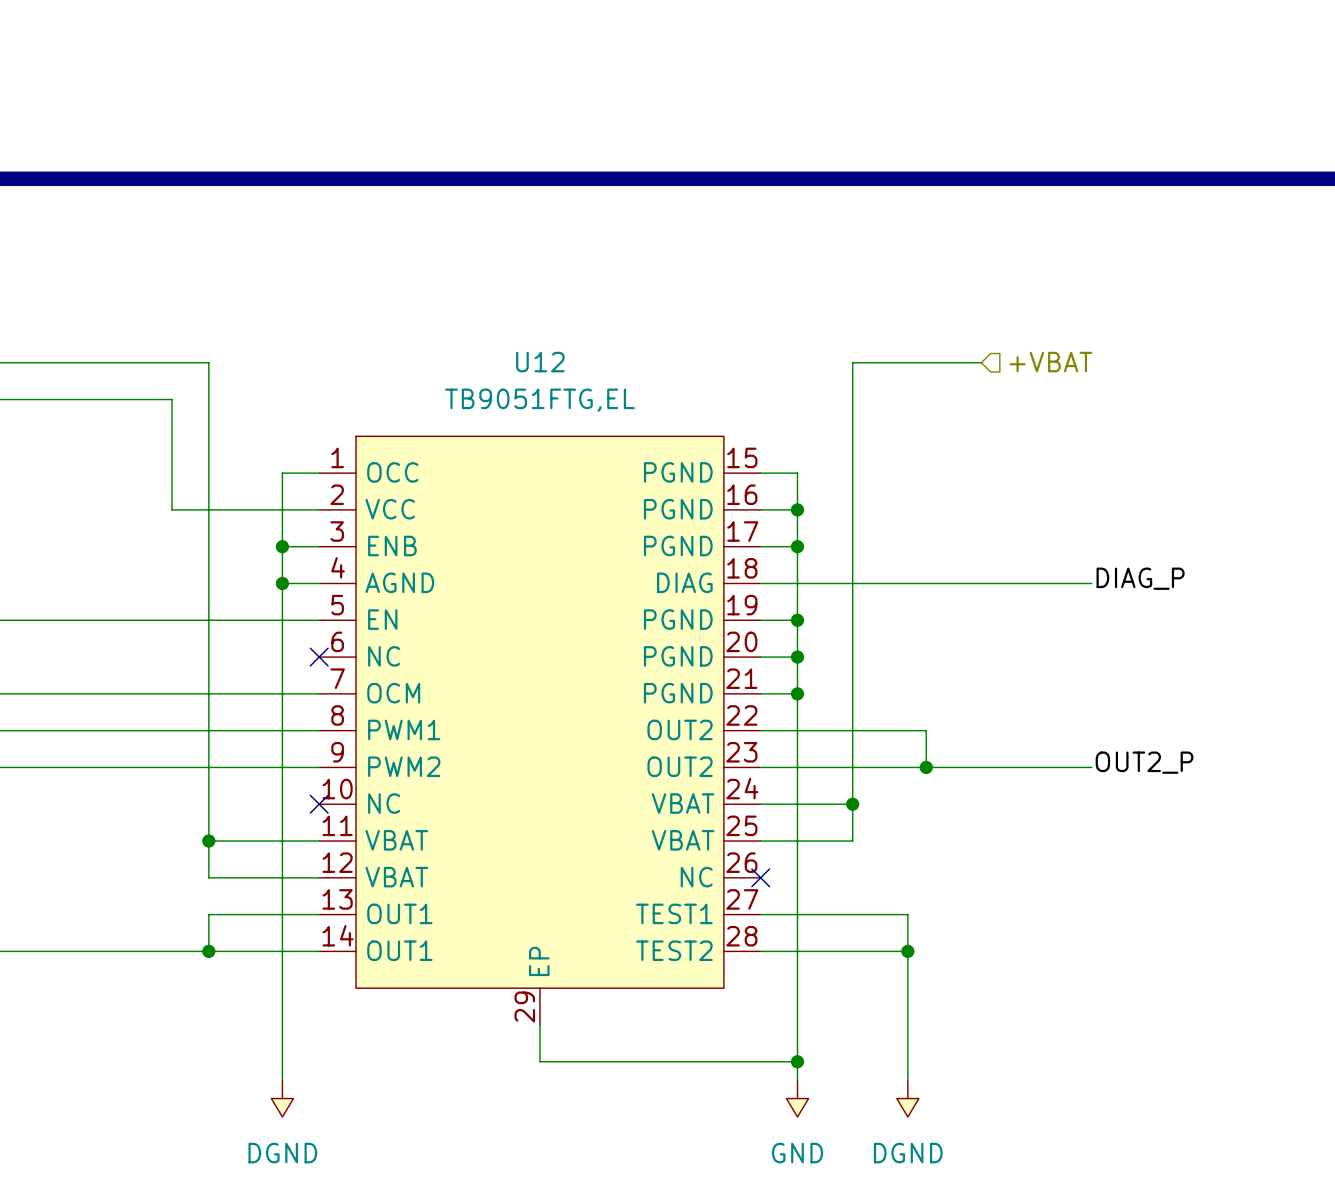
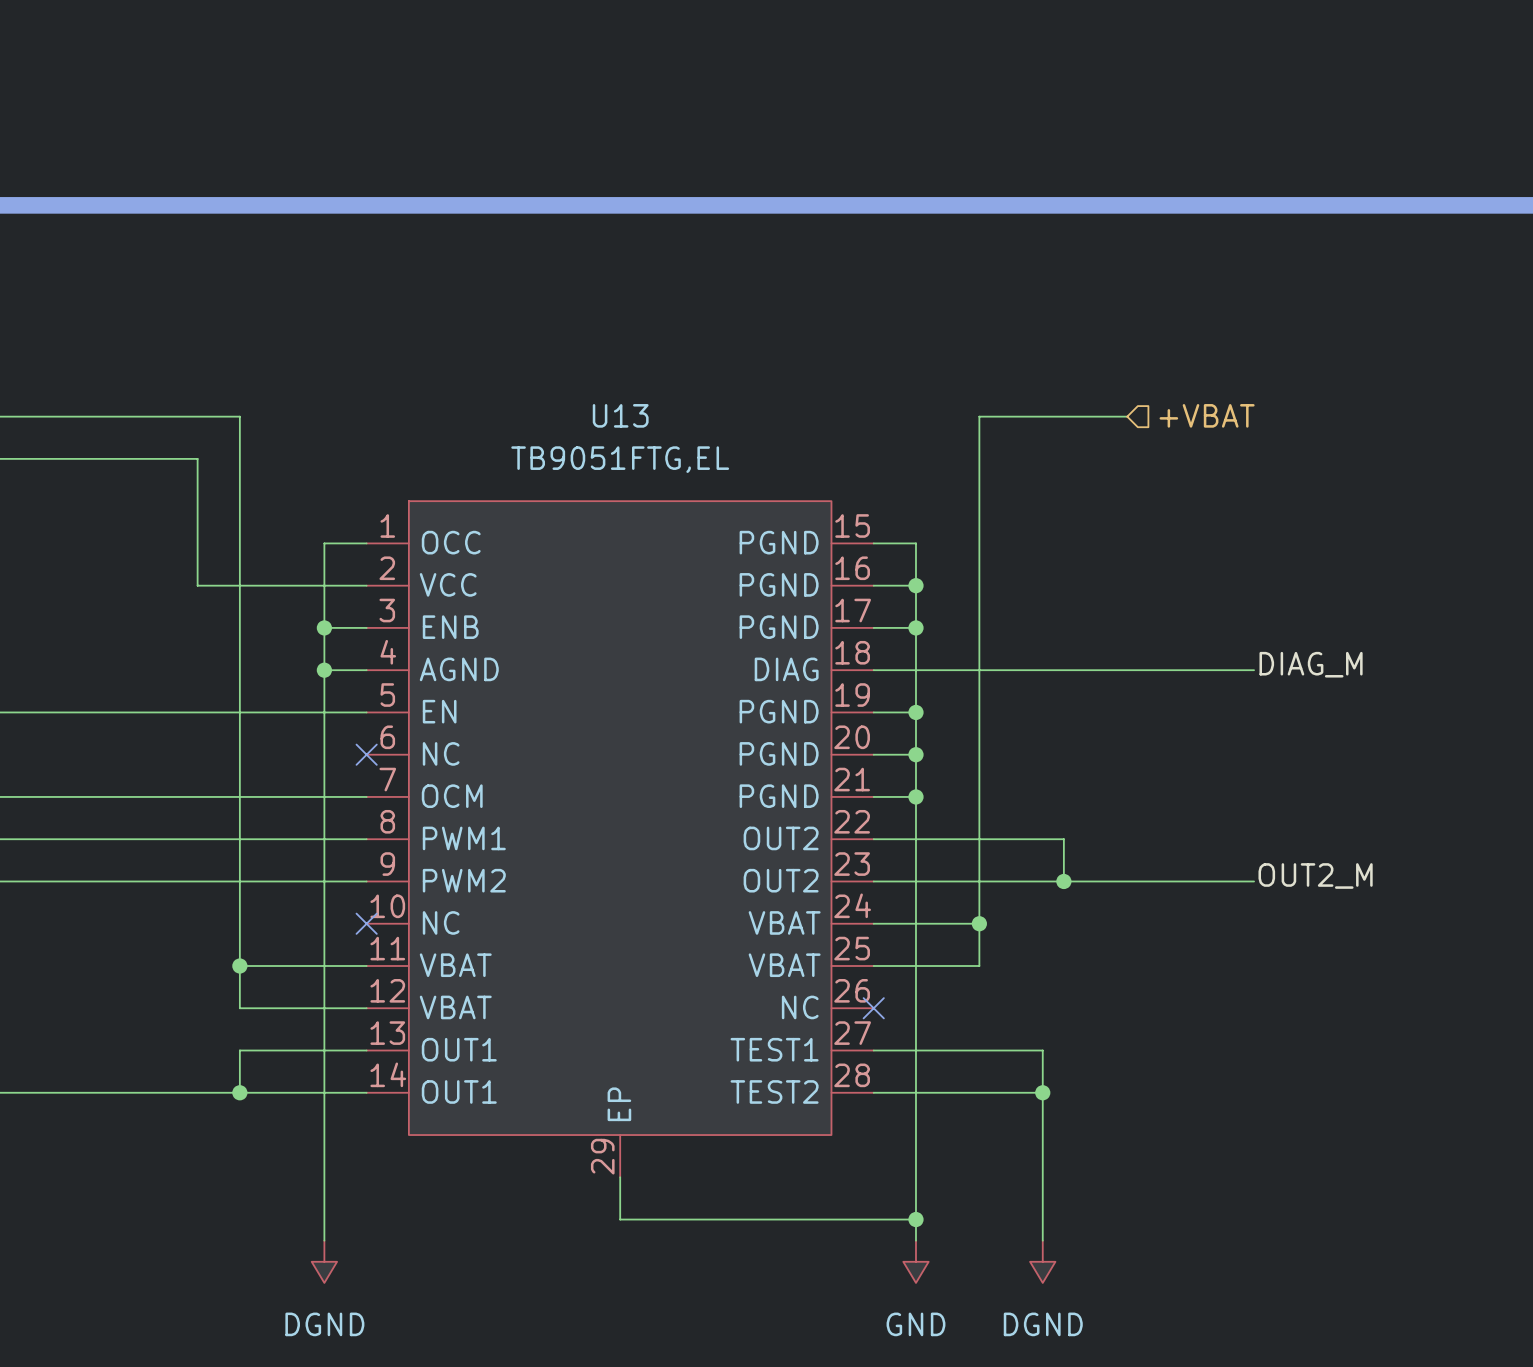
U12 name: U12 (540, 362) -> U13 (620, 415)
label: DIAG_P (1140, 578) -> DIAG_M (1311, 664)
label: OUT2_P (1144, 762) -> OUT2_M (1315, 875)

